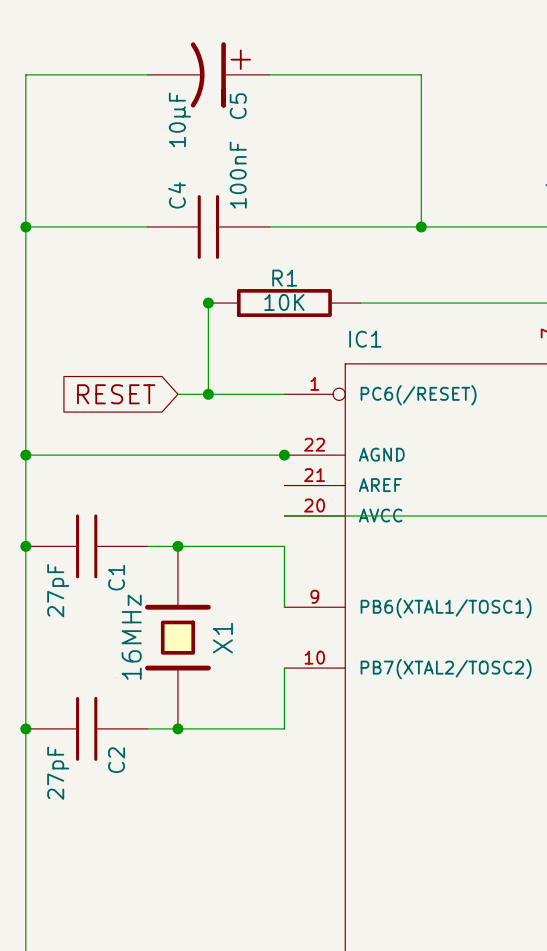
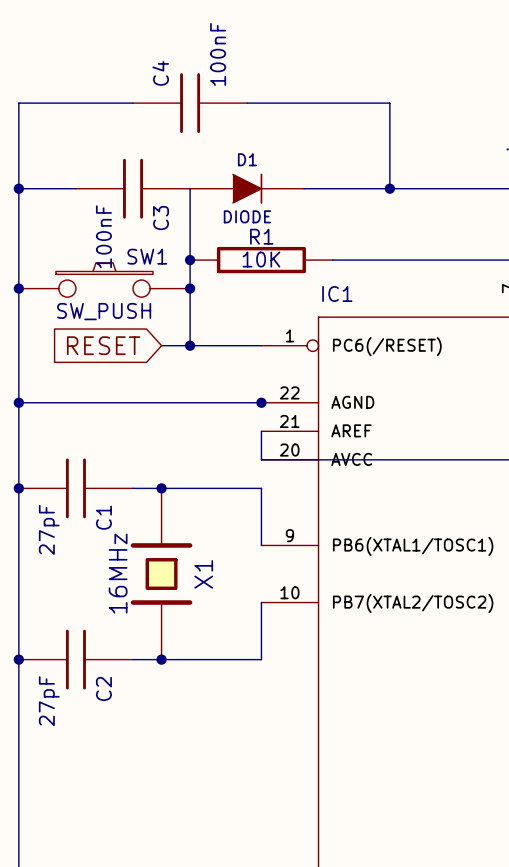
wire: (147, 74) (25, 74) (25, 135) -> (133, 103) (18, 103)
C5: 10µF (208, 74) -> none
wire: (269, 74) (421, 74) (421, 135) -> (247, 103) (389, 103)
C3: none -> 100nF (133, 188)
wire: none -> (190, 188) (190, 260)
C4 position: (208, 226) -> (190, 103)
D1: none -> DIODE (247, 188)
SW1: none -> SW_PUSH (104, 280)
junction: none -> (18, 288)
junction: none -> (190, 288)
wire: none -> (261, 431) (261, 459)

